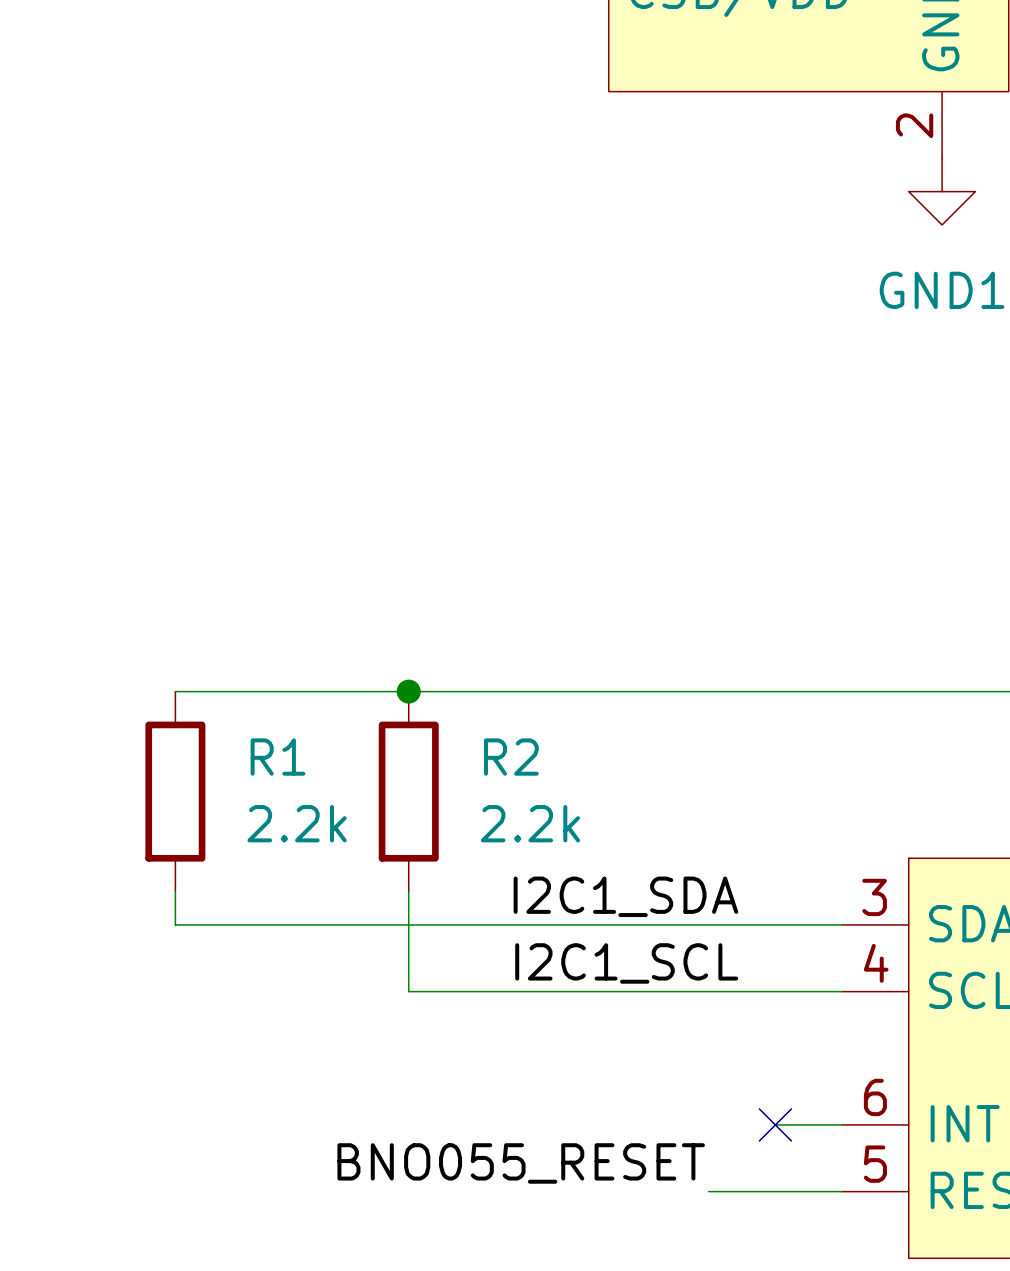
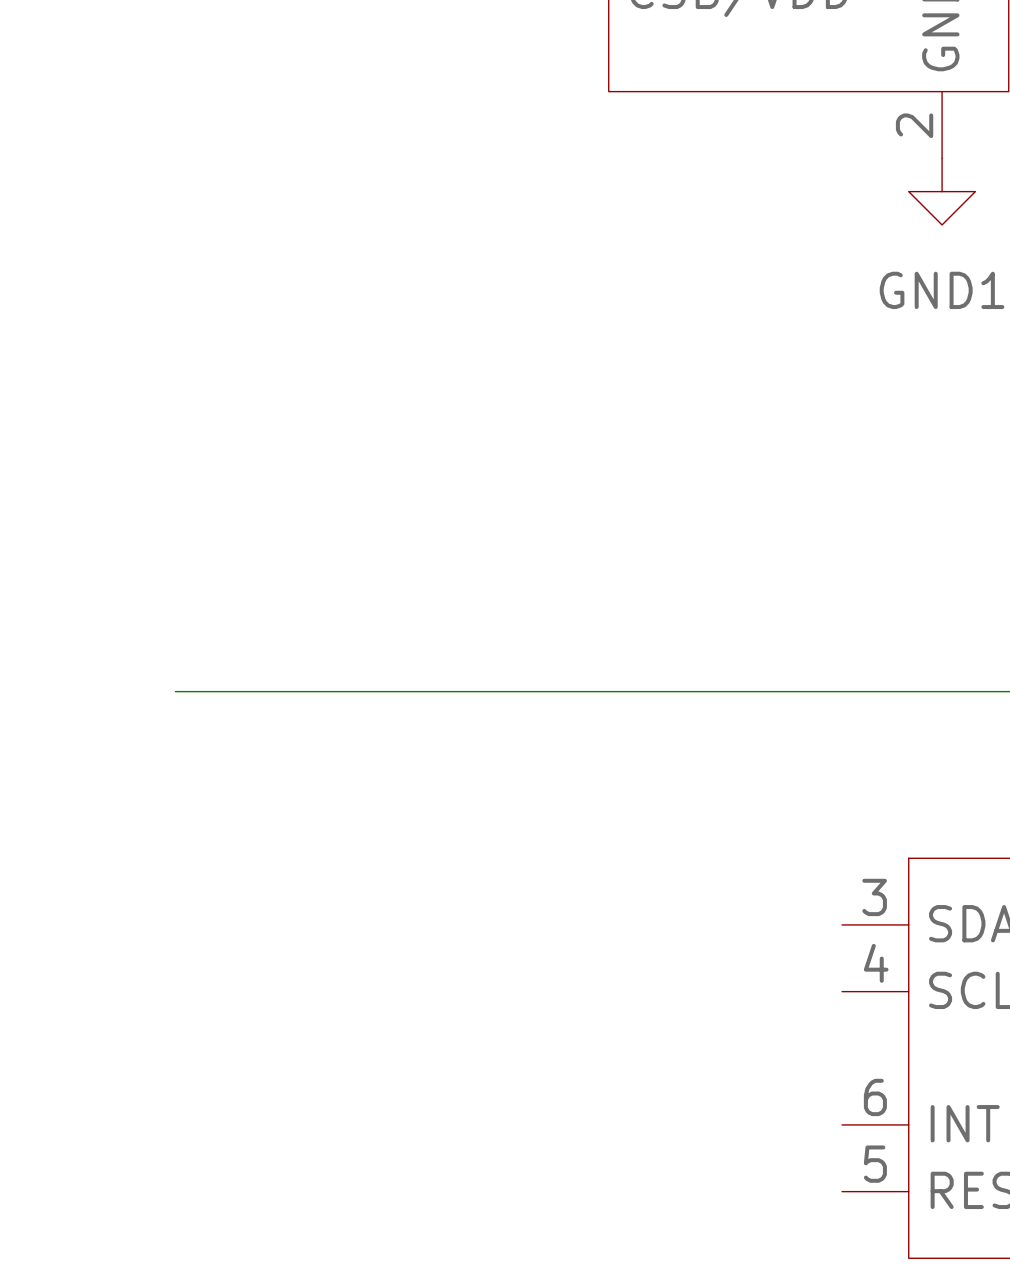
junction: (408, 691) -> none
R1: 2.2k (175, 791) -> none
R2: 2.2k (408, 791) -> none
wire: (175, 891) (175, 924) (842, 924) -> none
wire: (408, 891) (408, 991) (842, 991) -> none
label: I2C1_SDA (625, 896) -> none
label: I2C1_SCL (626, 963) -> none
wire: (775, 1124) (842, 1124) -> none
no-connect mark: (775, 1124) -> none
label: BNO055_RESET (521, 1163) -> none
wire: (708, 1191) (842, 1191) -> none

